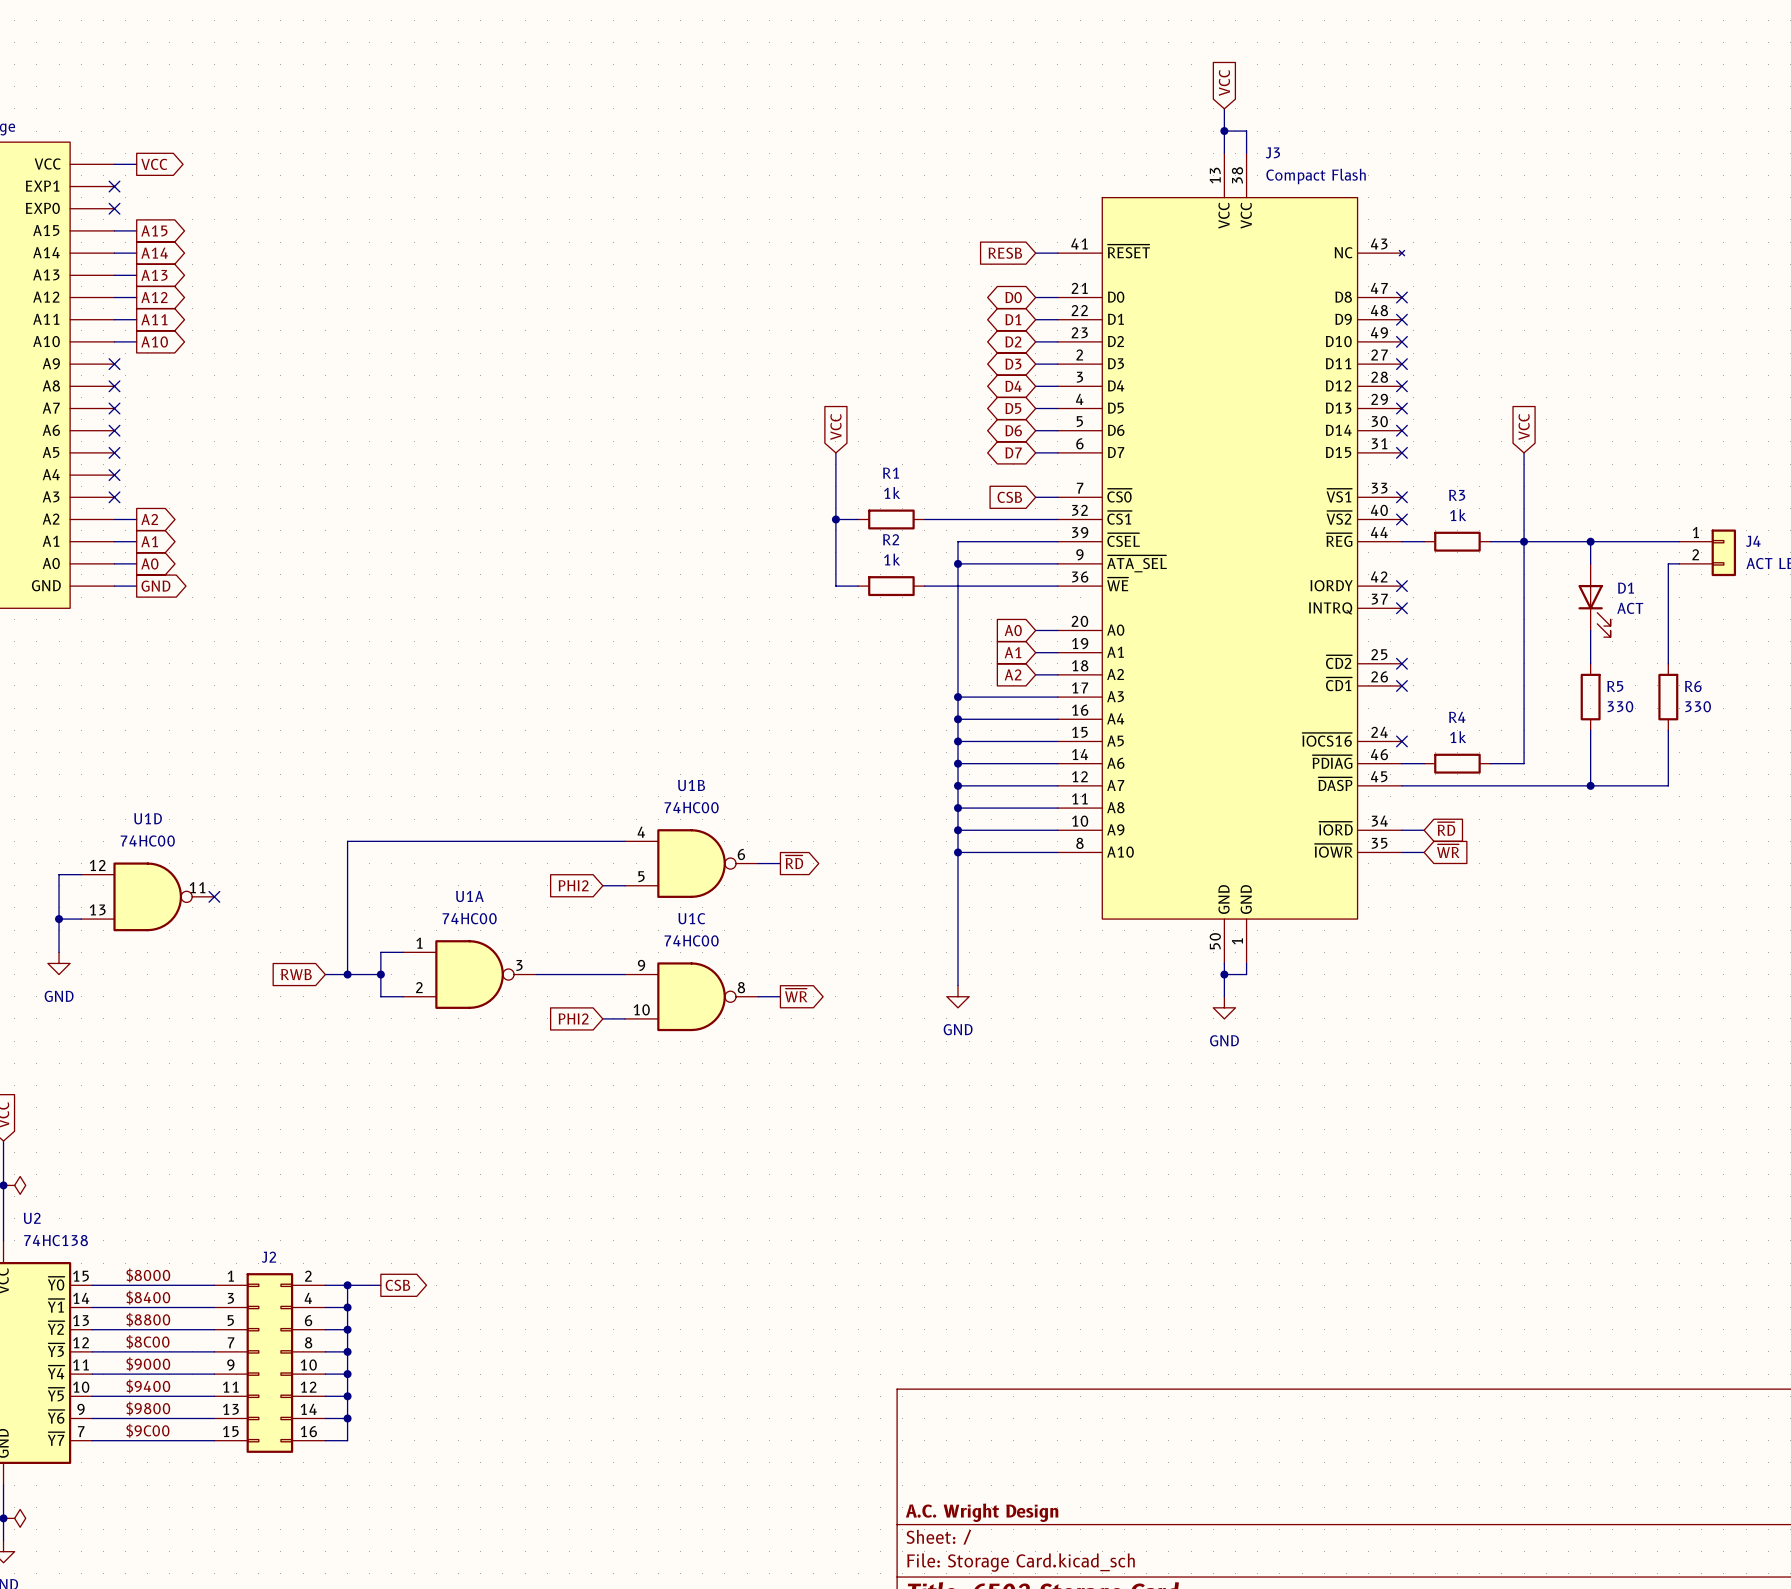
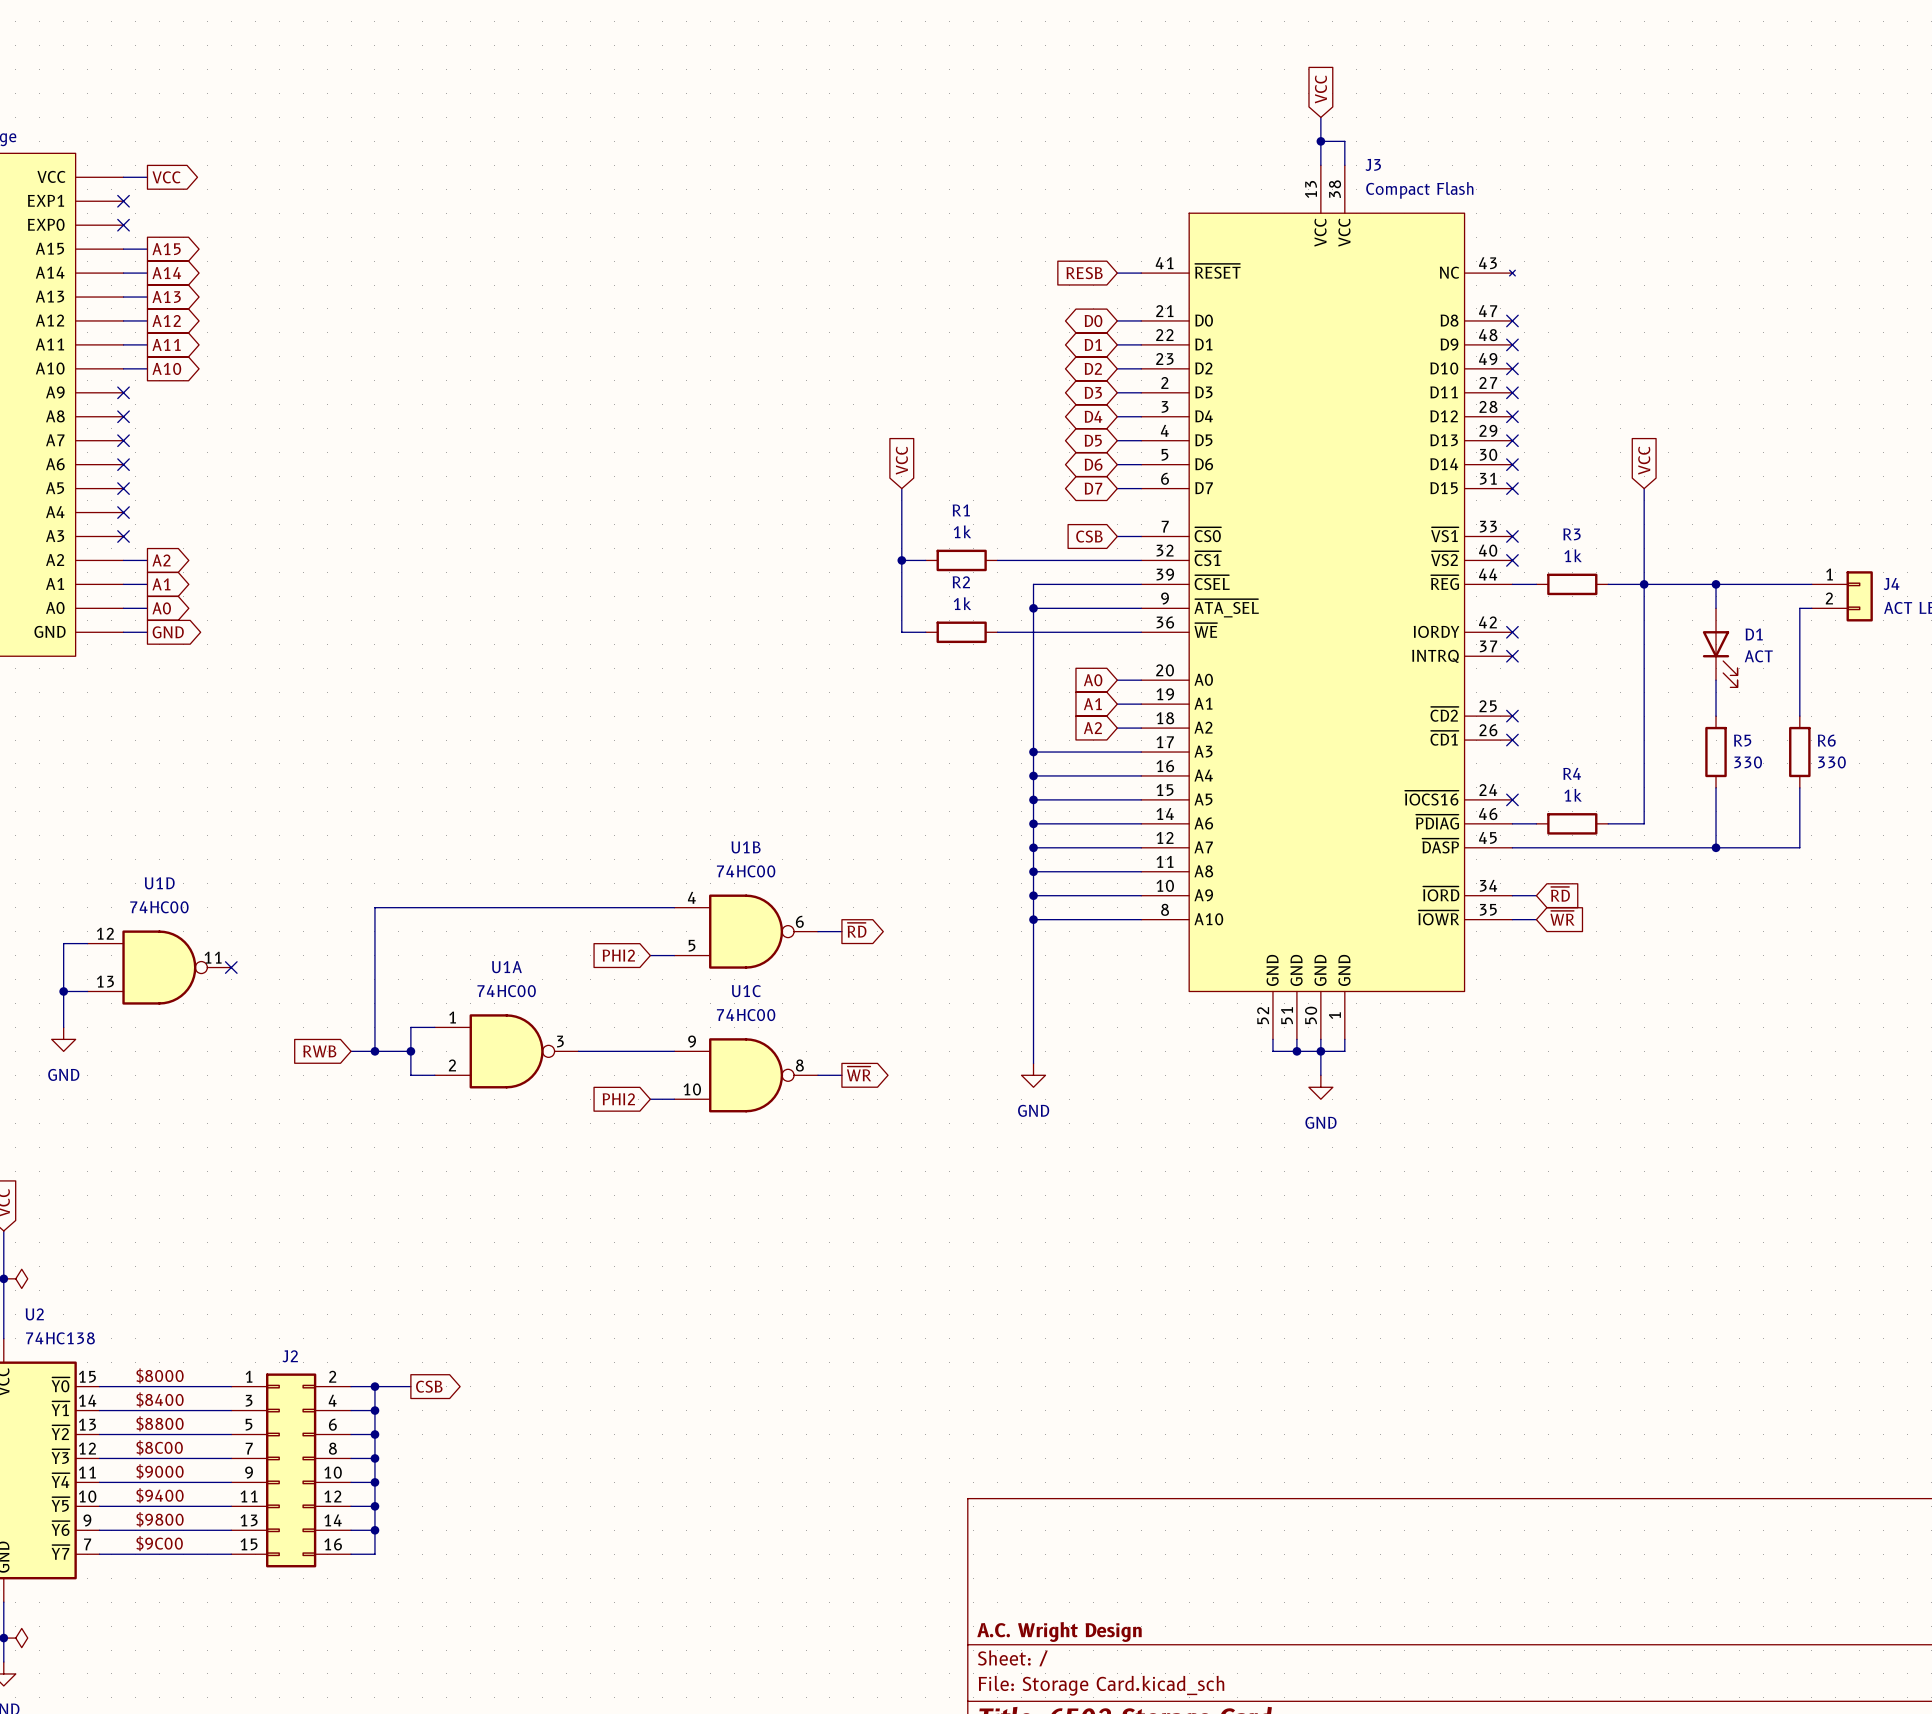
J3 symbol: [1057, 153, 1405, 964] -> [1141, 165, 1516, 1040]
wire: none -> (1272, 1039) (1272, 1051) (1320, 1051)
wire: none -> (1296, 1039) (1296, 1051)
junction: none -> (1296, 1051)

